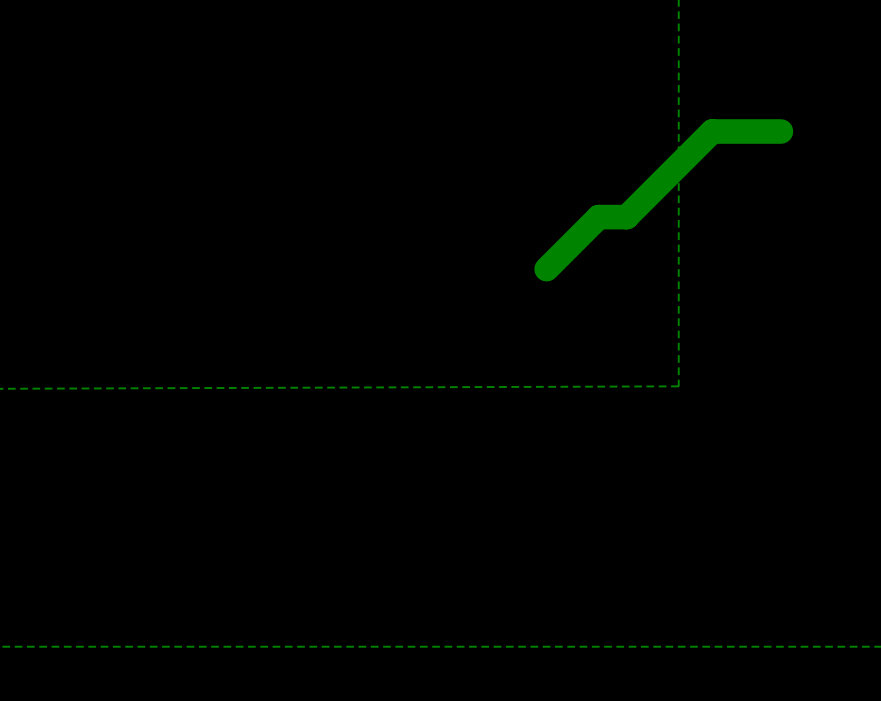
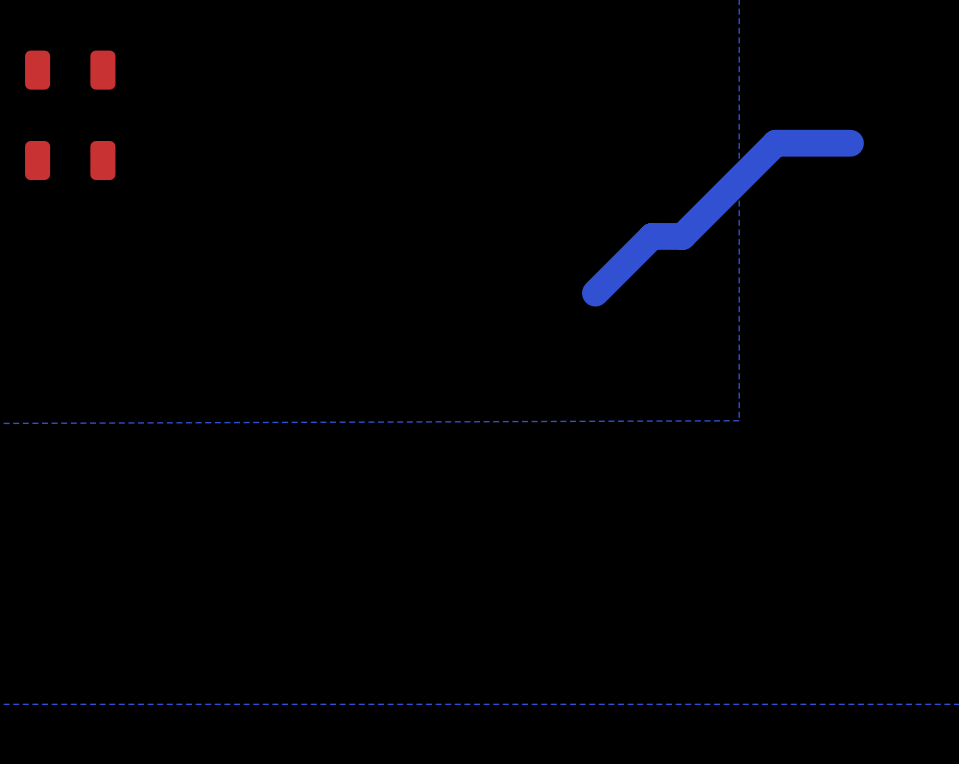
part: none -> (70, 70)
part: none -> (70, 160)

